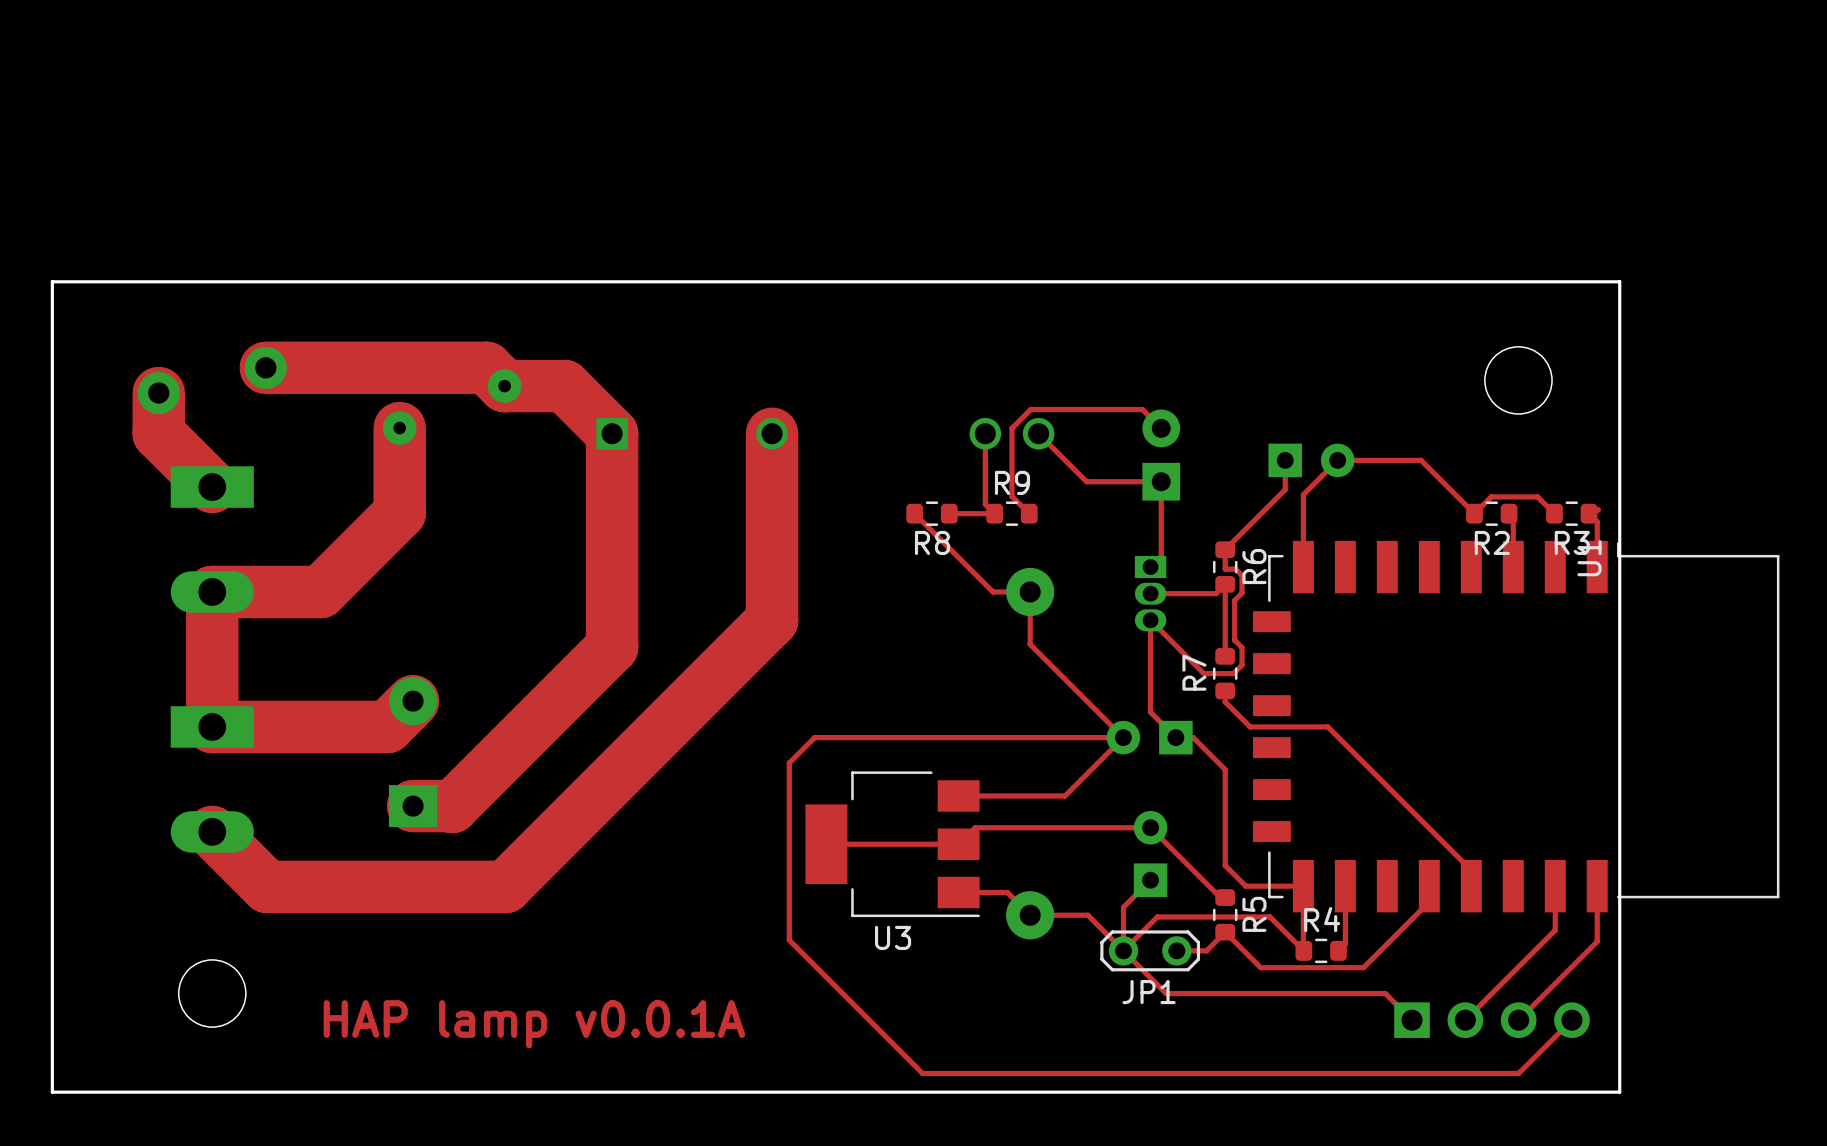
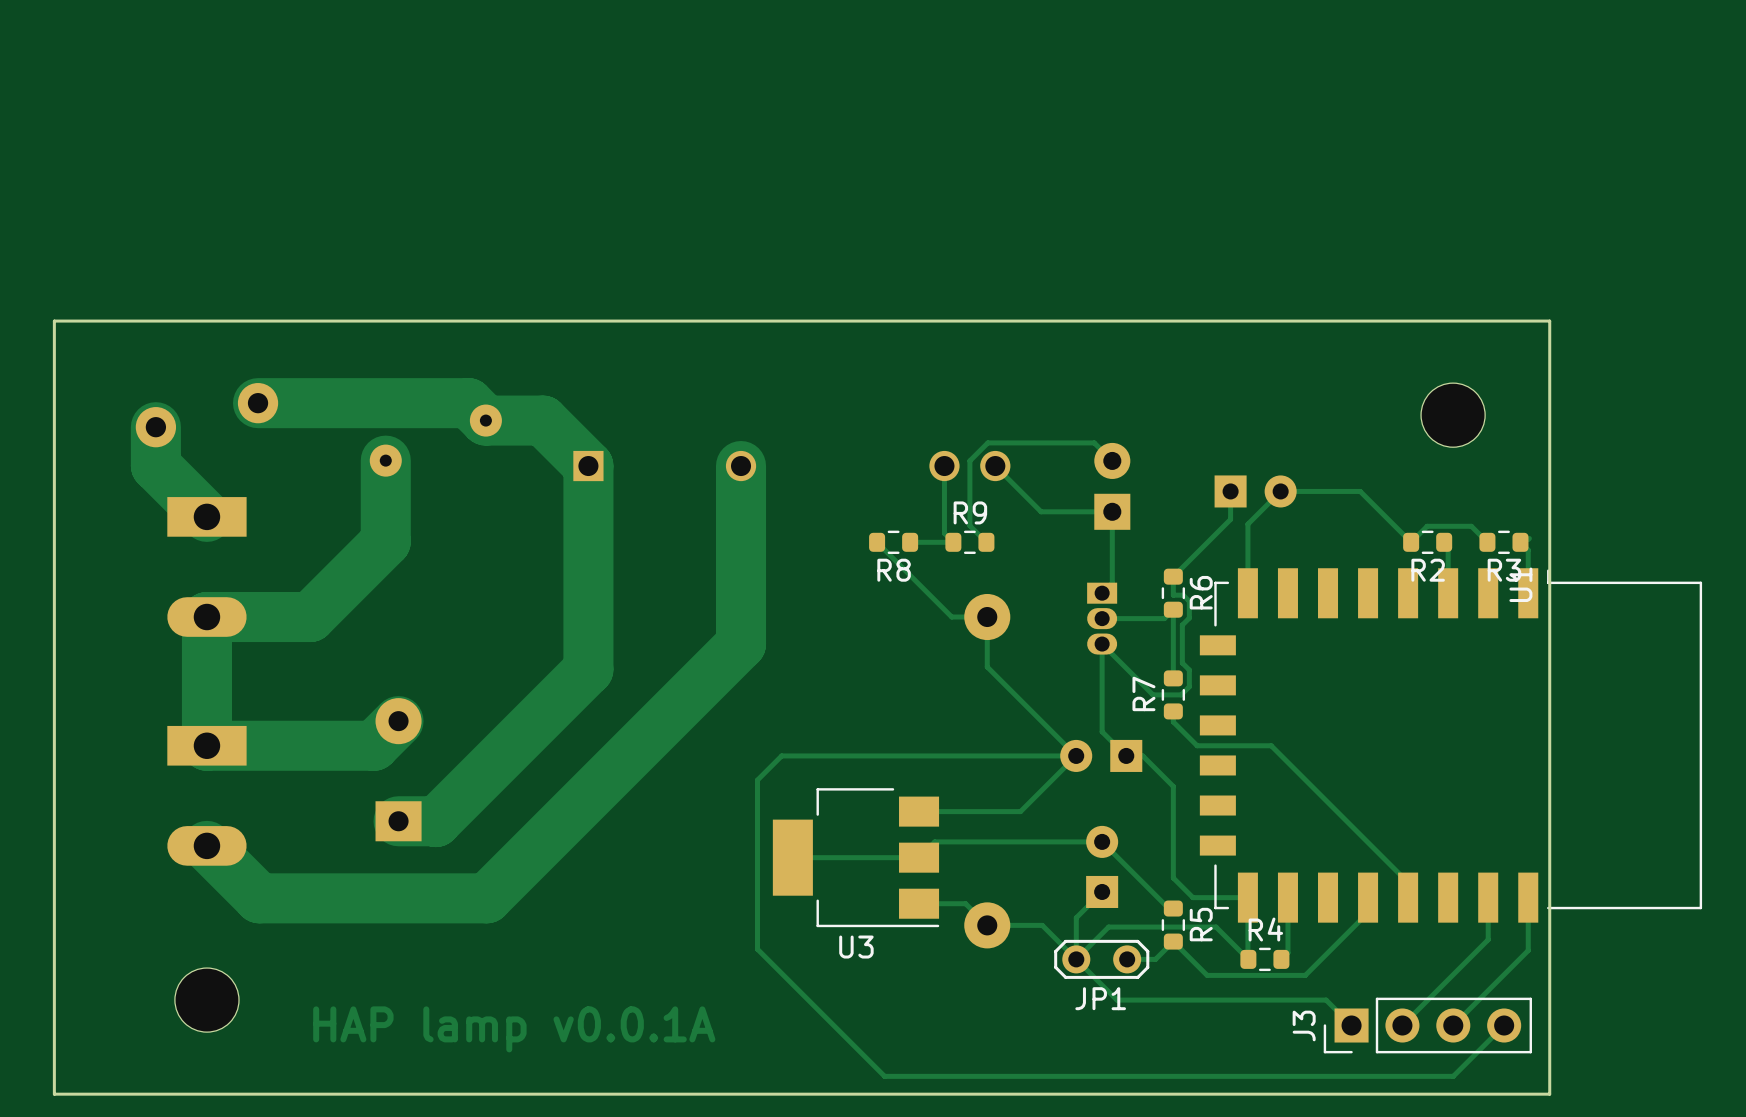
J3 side: bottom (1492, 1020) -> top (1427, 1025)

